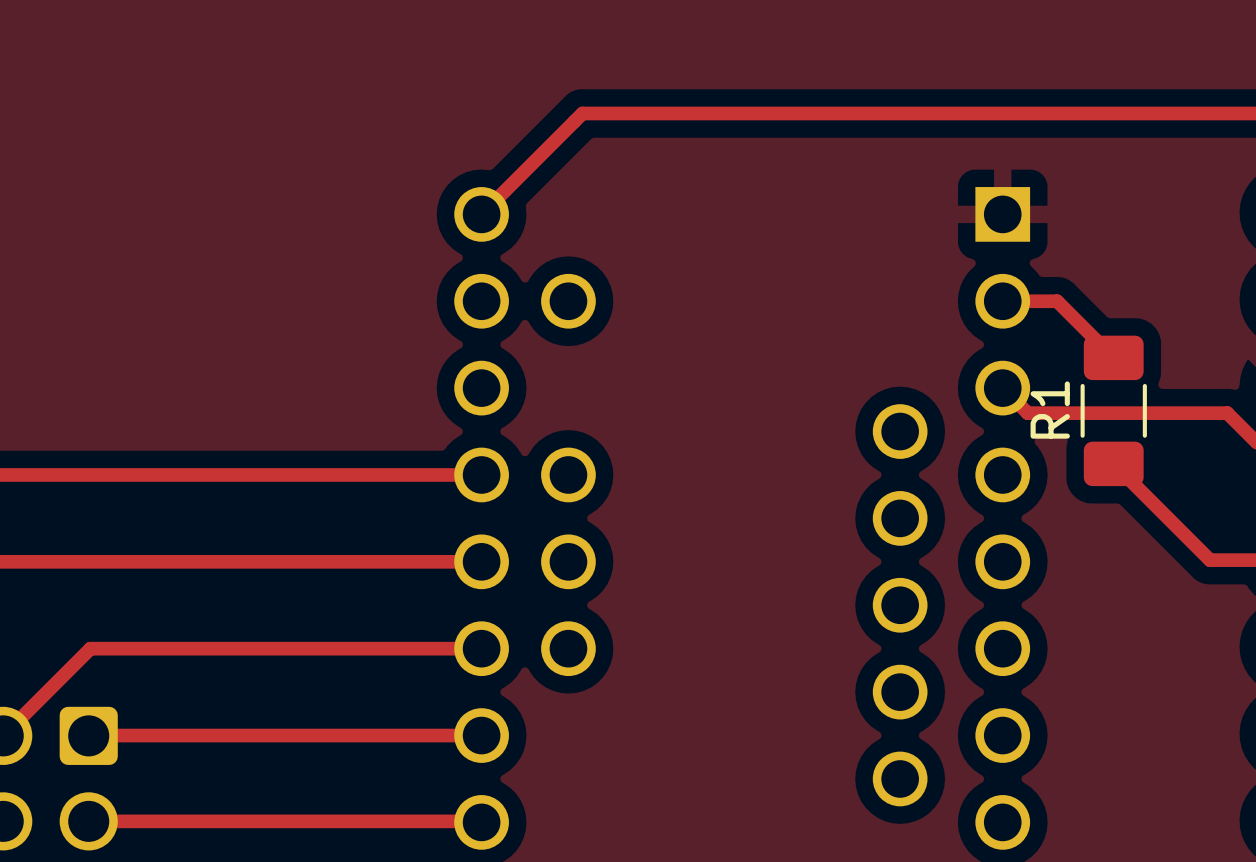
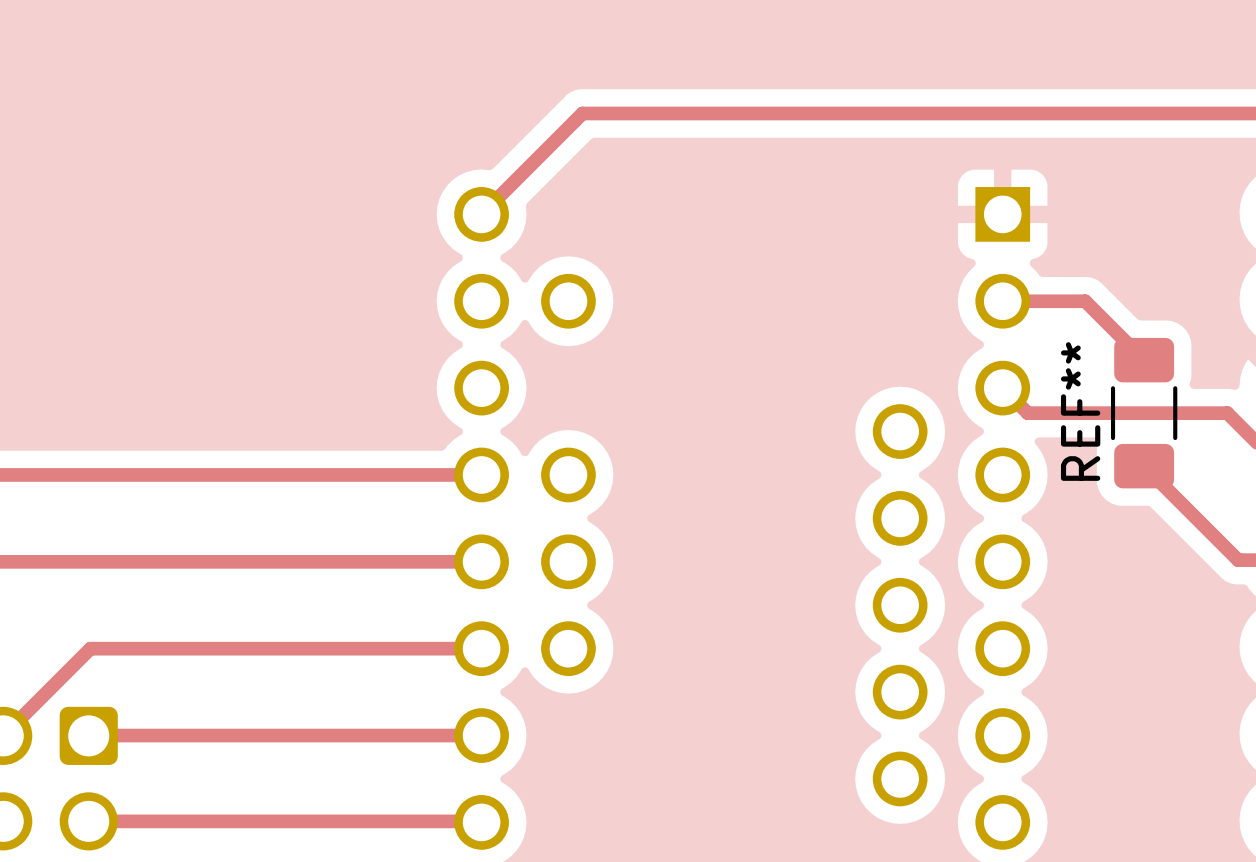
top track: (1057, 301) (1113, 357) -> (1057, 301) (1085, 301) (1144, 360)
R1 name: R1 (1050, 410) -> REF** (1080, 411)
R1 position: (1113, 410) -> (1144, 413)
top track: (1113, 463) (1209, 560) (1238, 560) -> (1144, 466) (1238, 560)

